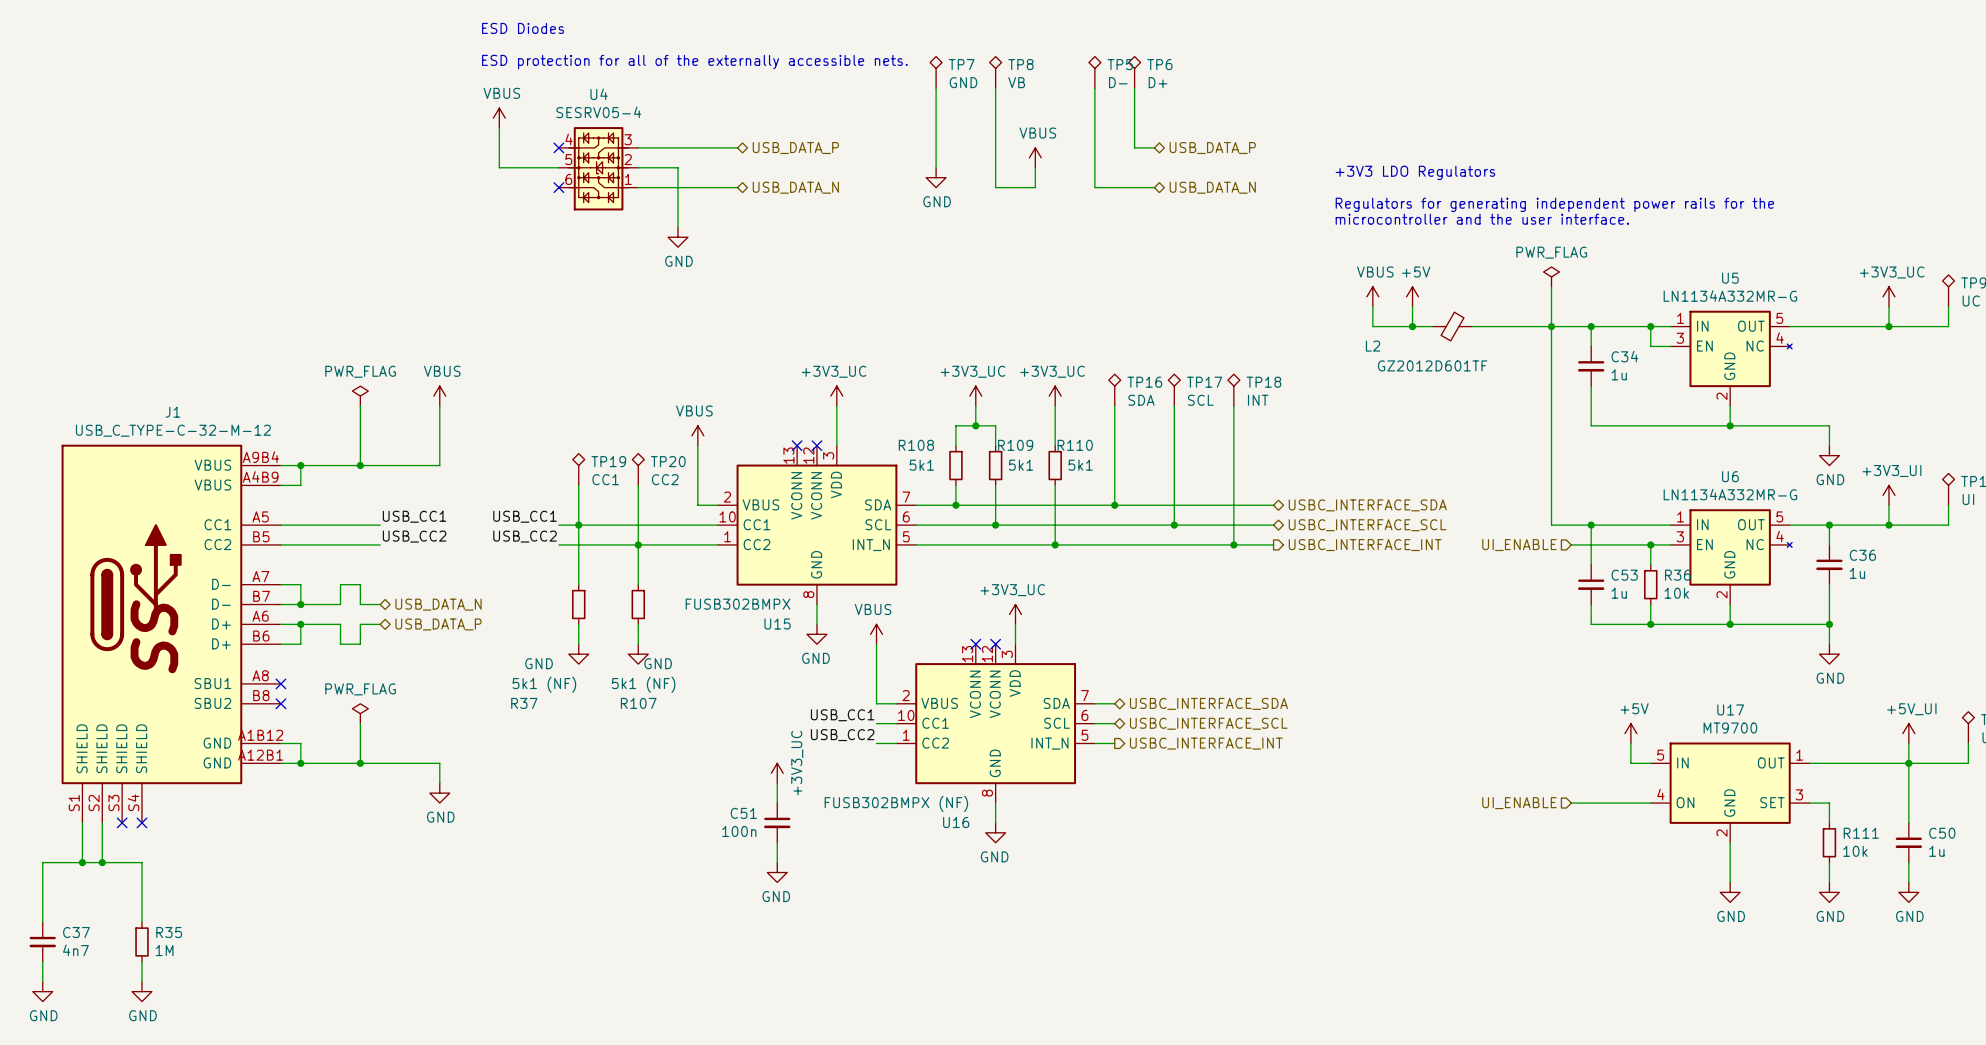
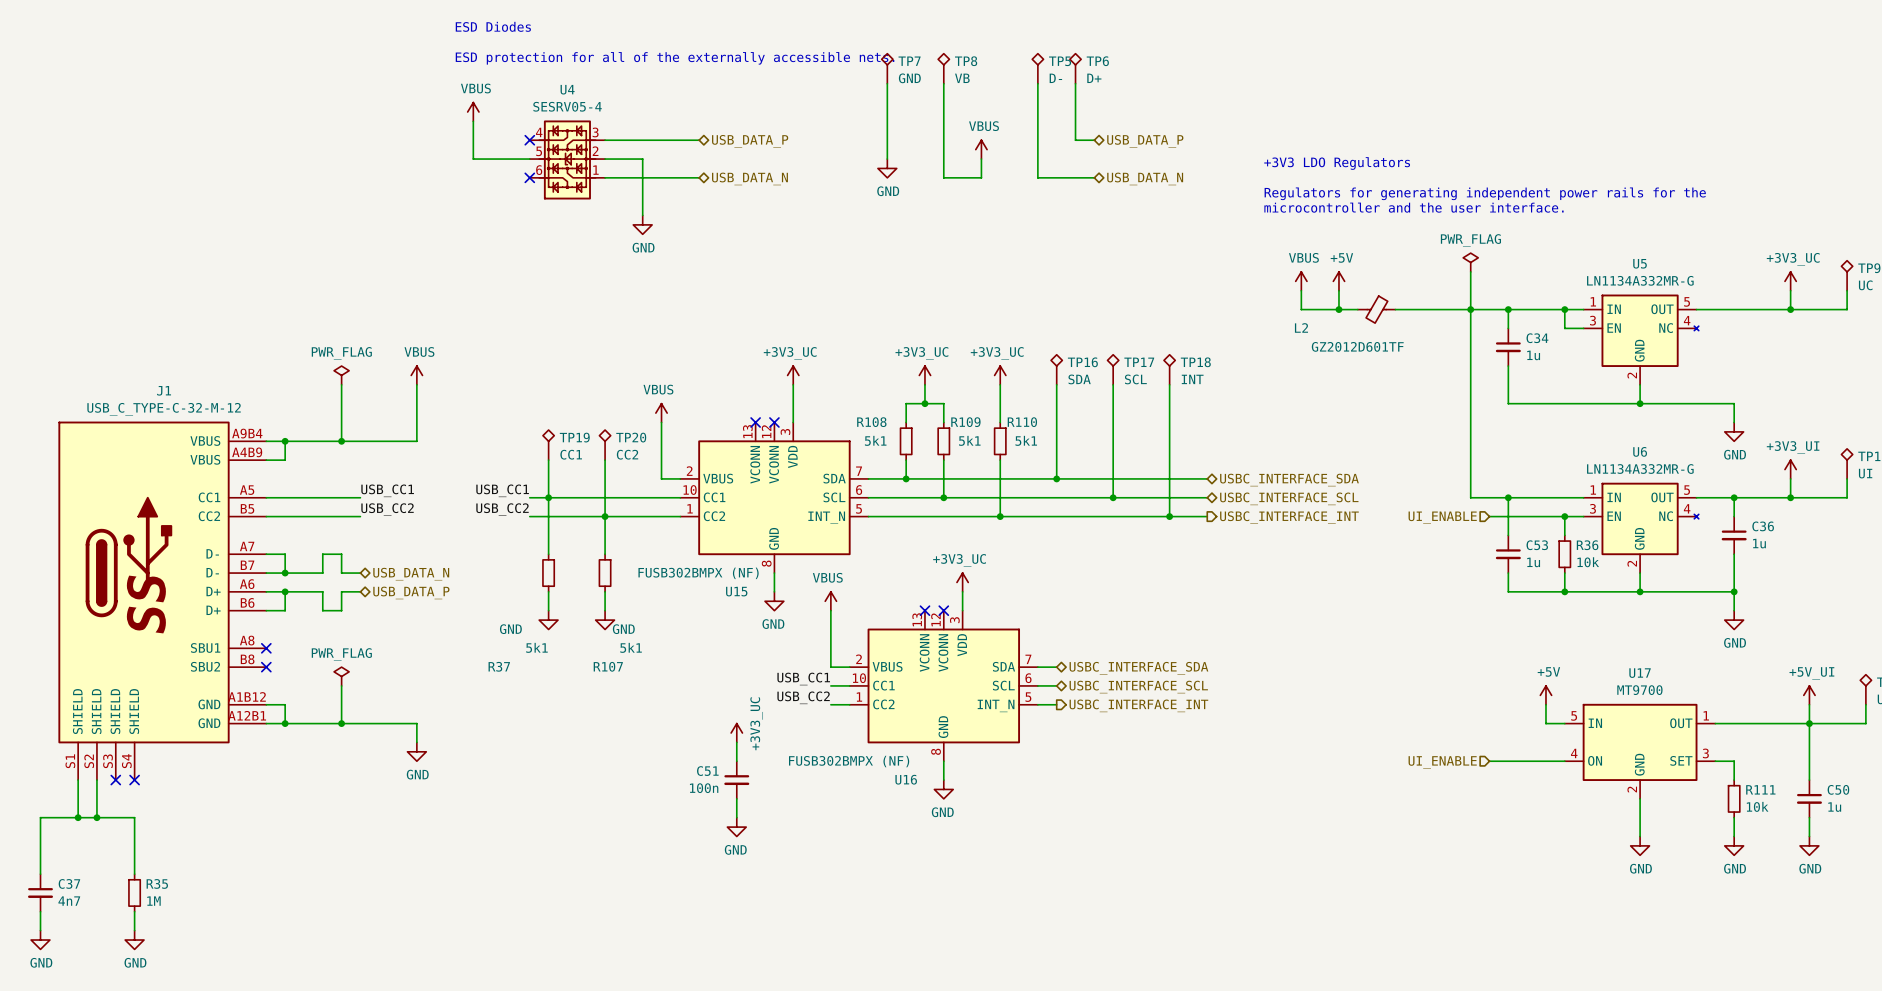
U15 value: FUSB302BMPX (738, 604) -> FUSB302BMPX (NF) (698, 573)
R37 value: 5k1 (NF) (544, 684) -> 5k1 (536, 647)
R107 value: 5k1 (NF) (643, 684) -> 5k1 (631, 647)

